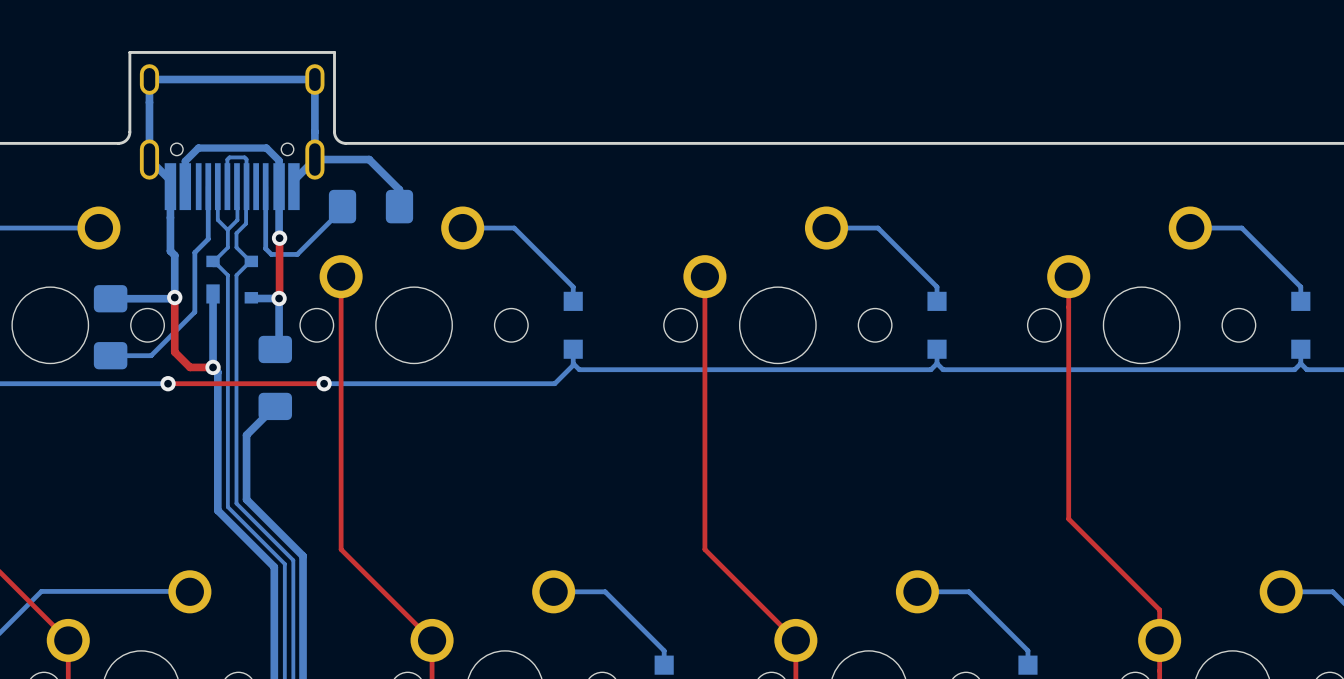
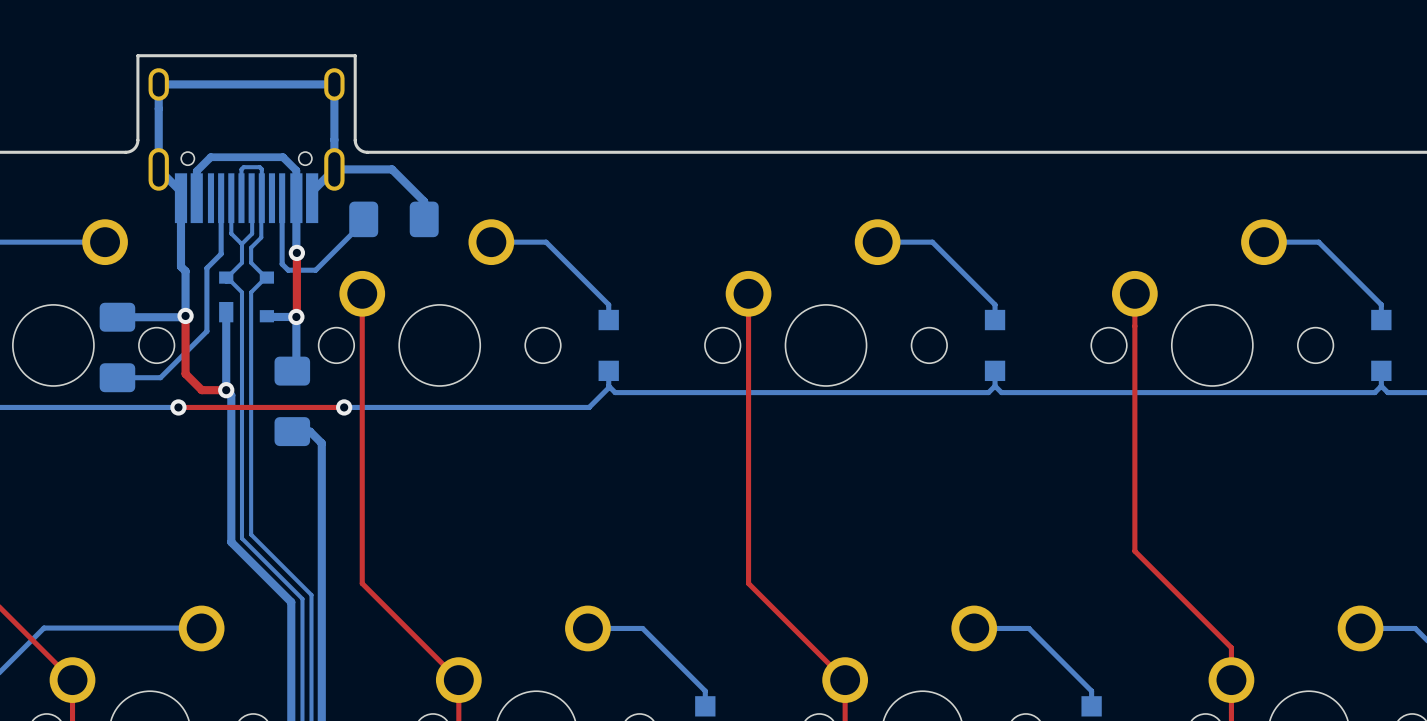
bottom track: (275, 406) (246, 435) (246, 499) (303, 556) -> (292, 431) (310, 431) (321, 443) (321, 590)

